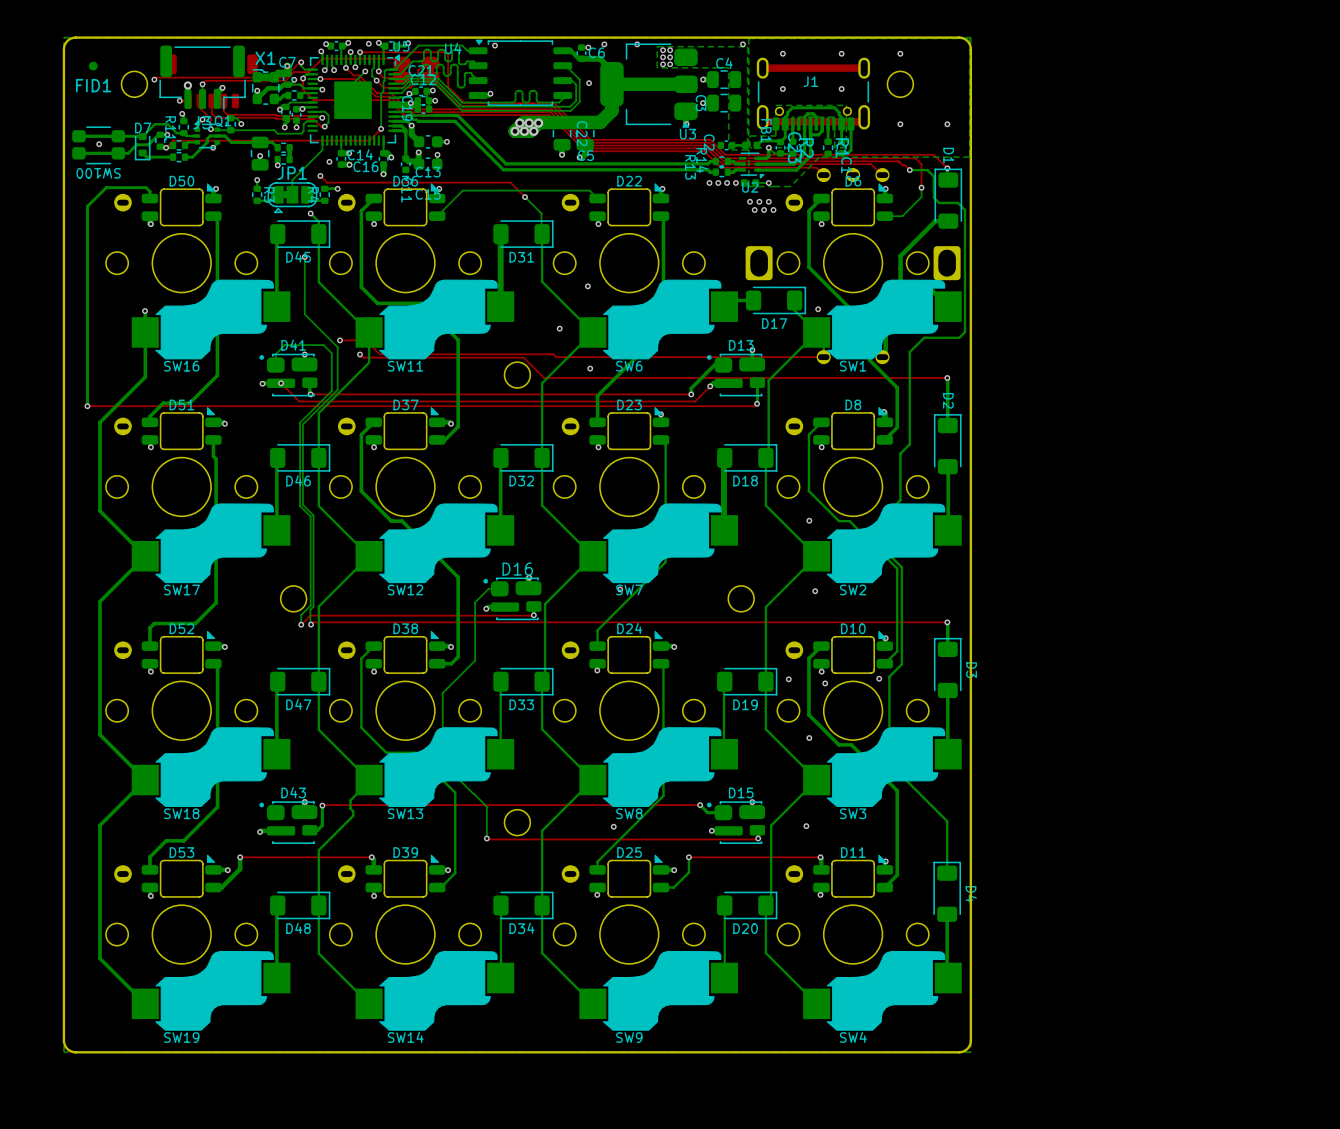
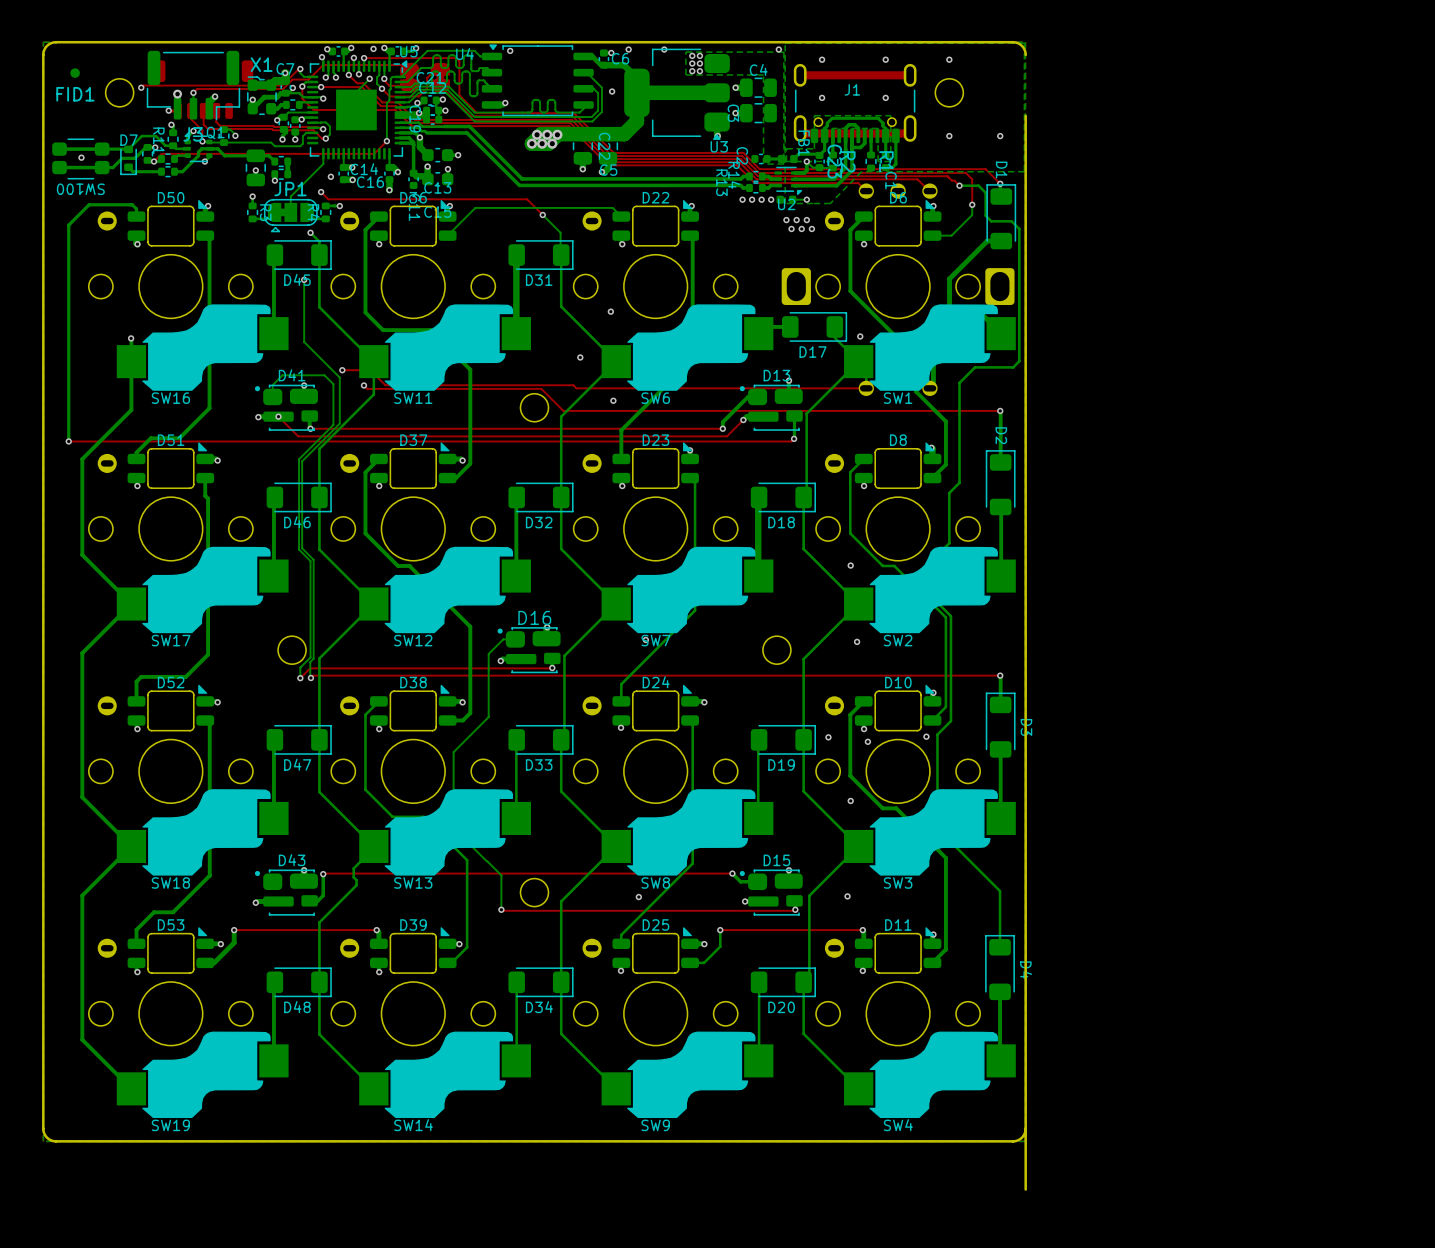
board edge: (970, 49) (970, 105) -> none
board edge: none -> (1025, 1128) (1025, 1189)

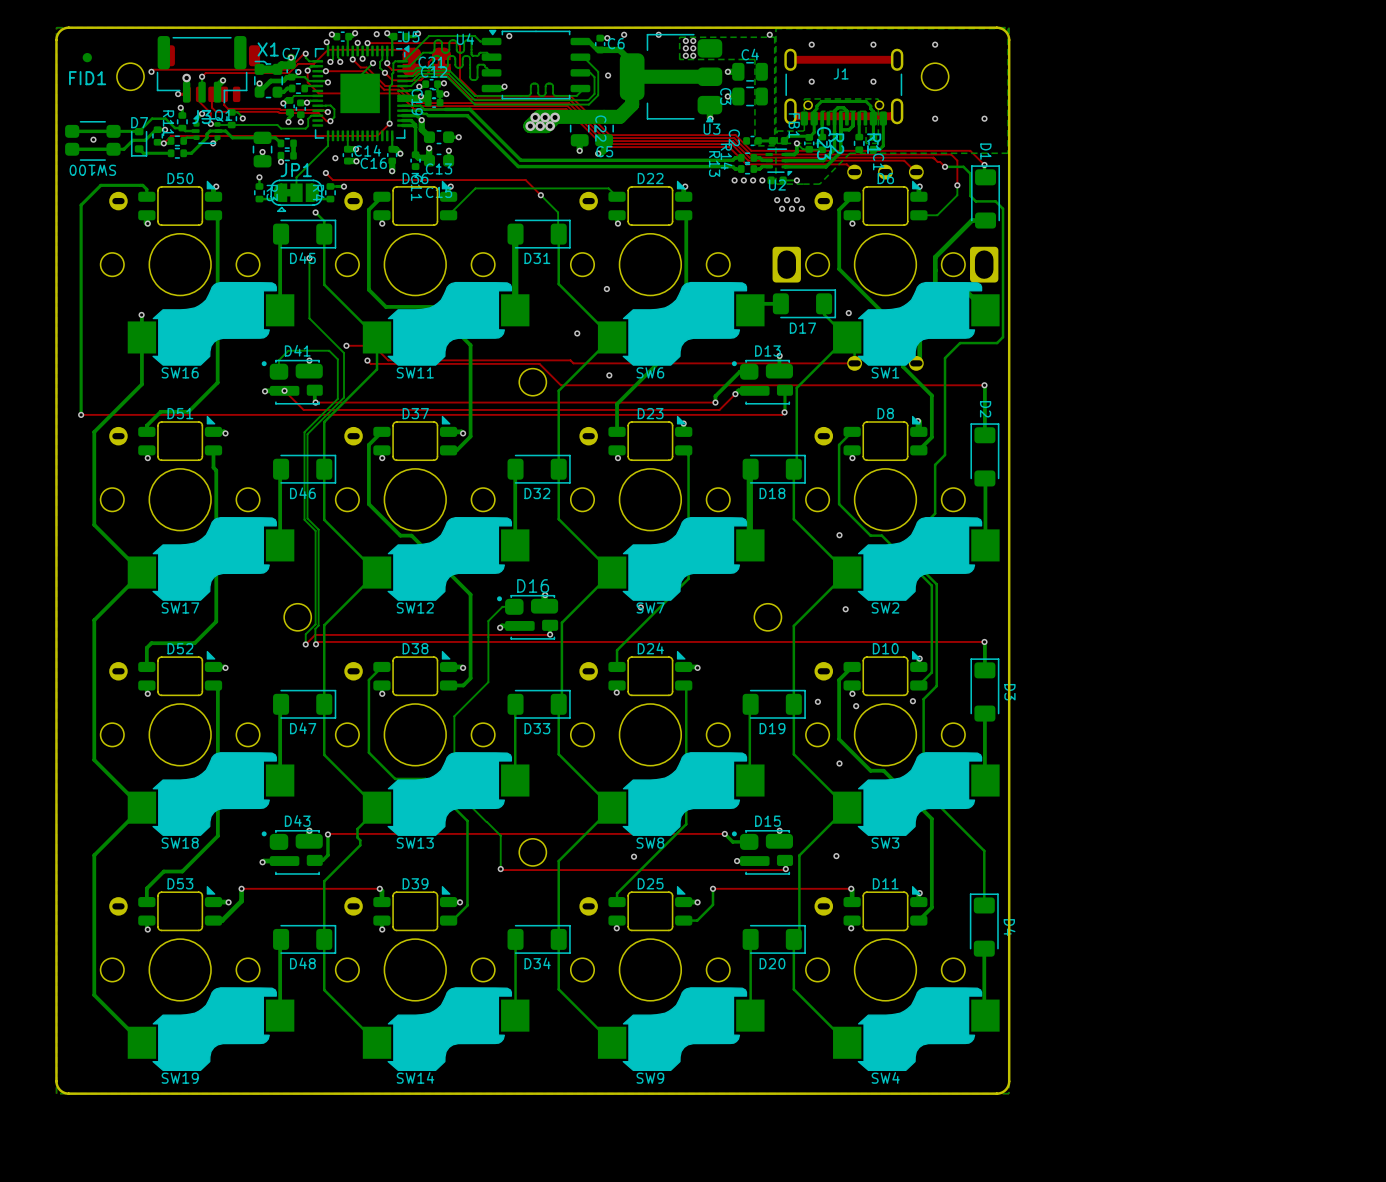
board edge: none -> (1009, 40) (1009, 99)
board edge: (1025, 1128) (1025, 1189) -> none

